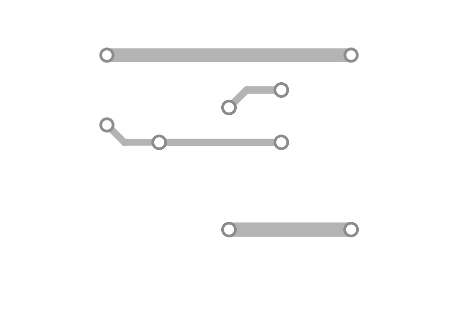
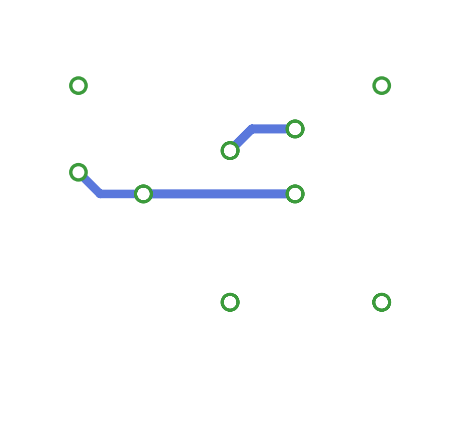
track: (351, 55) (106, 55) -> none
track: (351, 229) (228, 229) -> none

